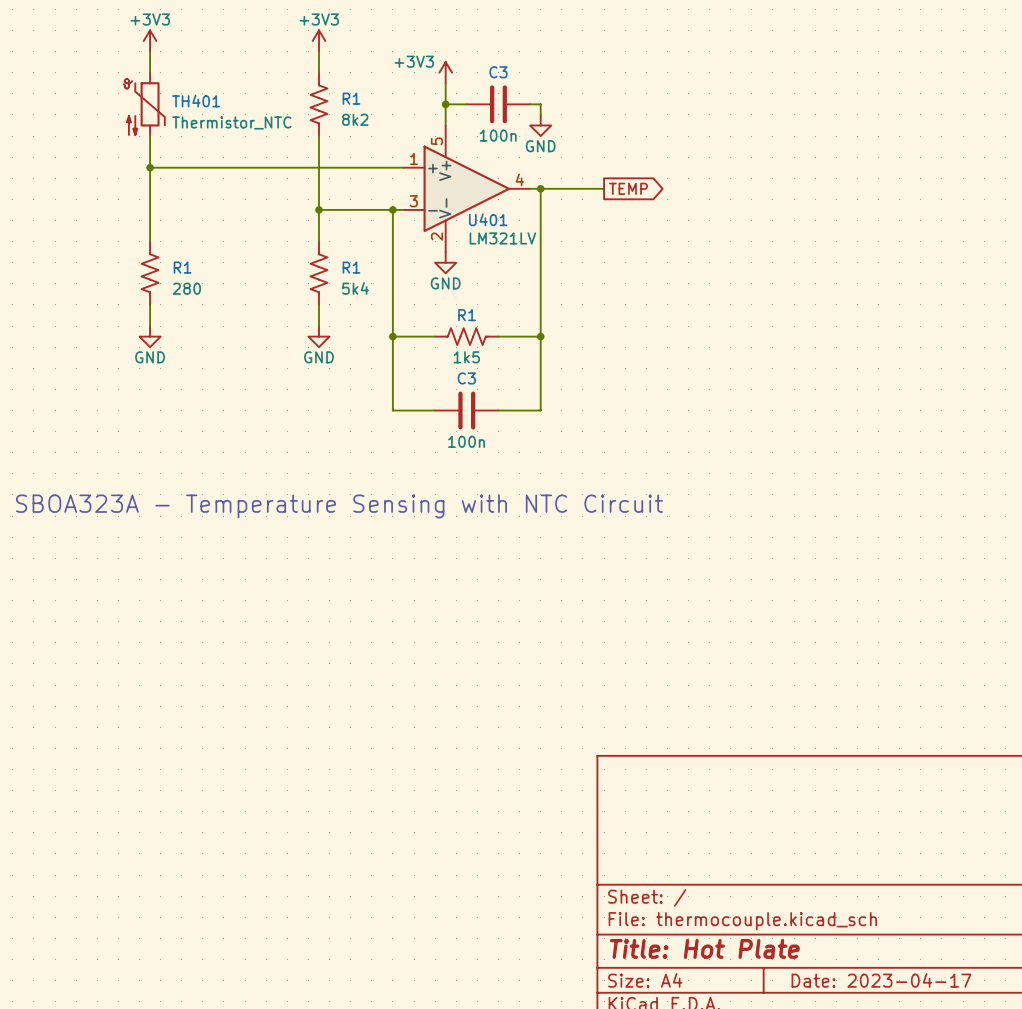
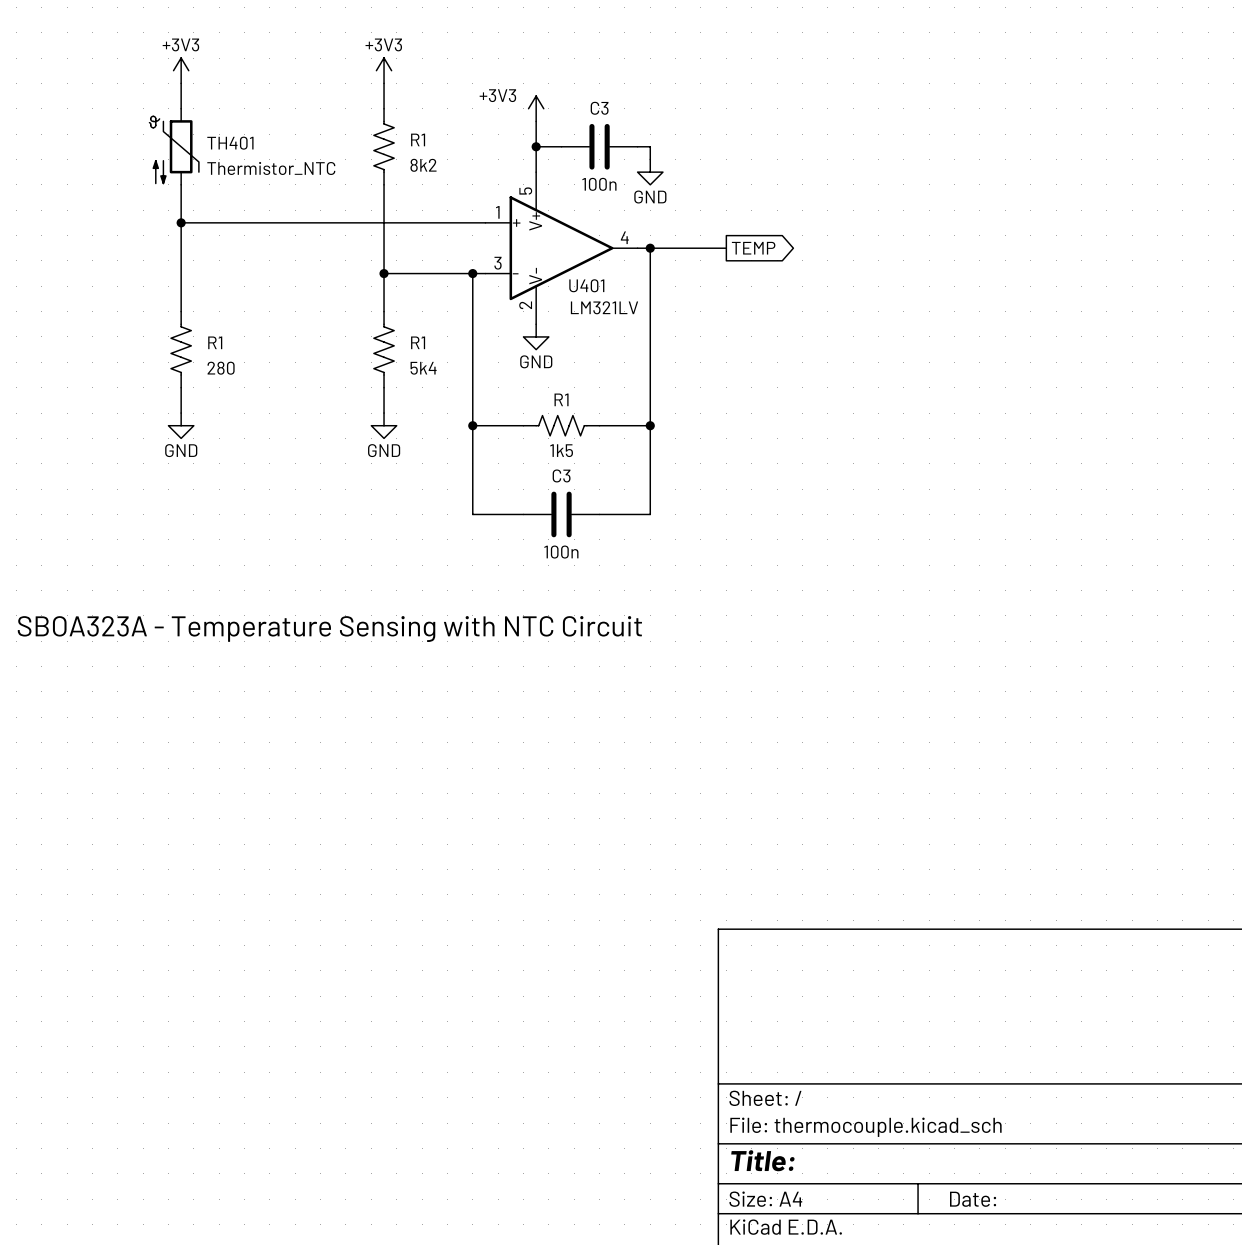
title block: Title: Hot Plate (704, 948) -> Title: (762, 1160)
title block: Date: 2023-04-17 (881, 980) -> Date: (973, 1199)

